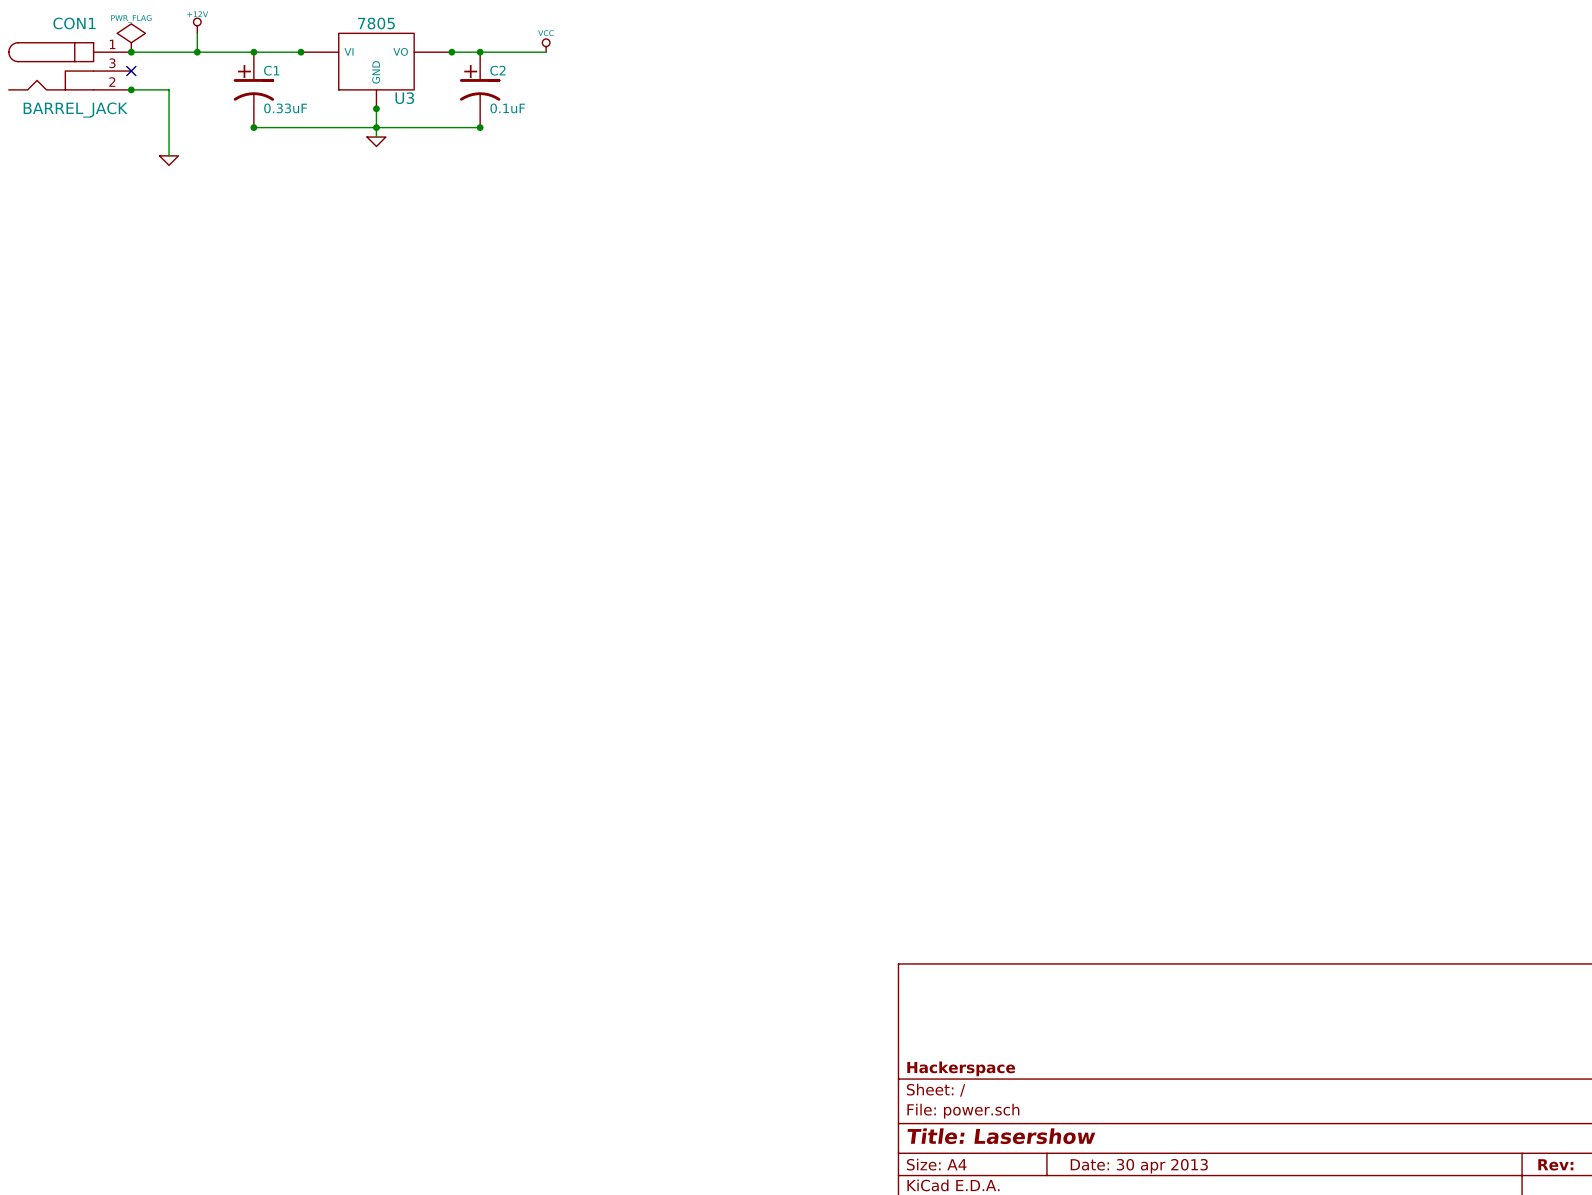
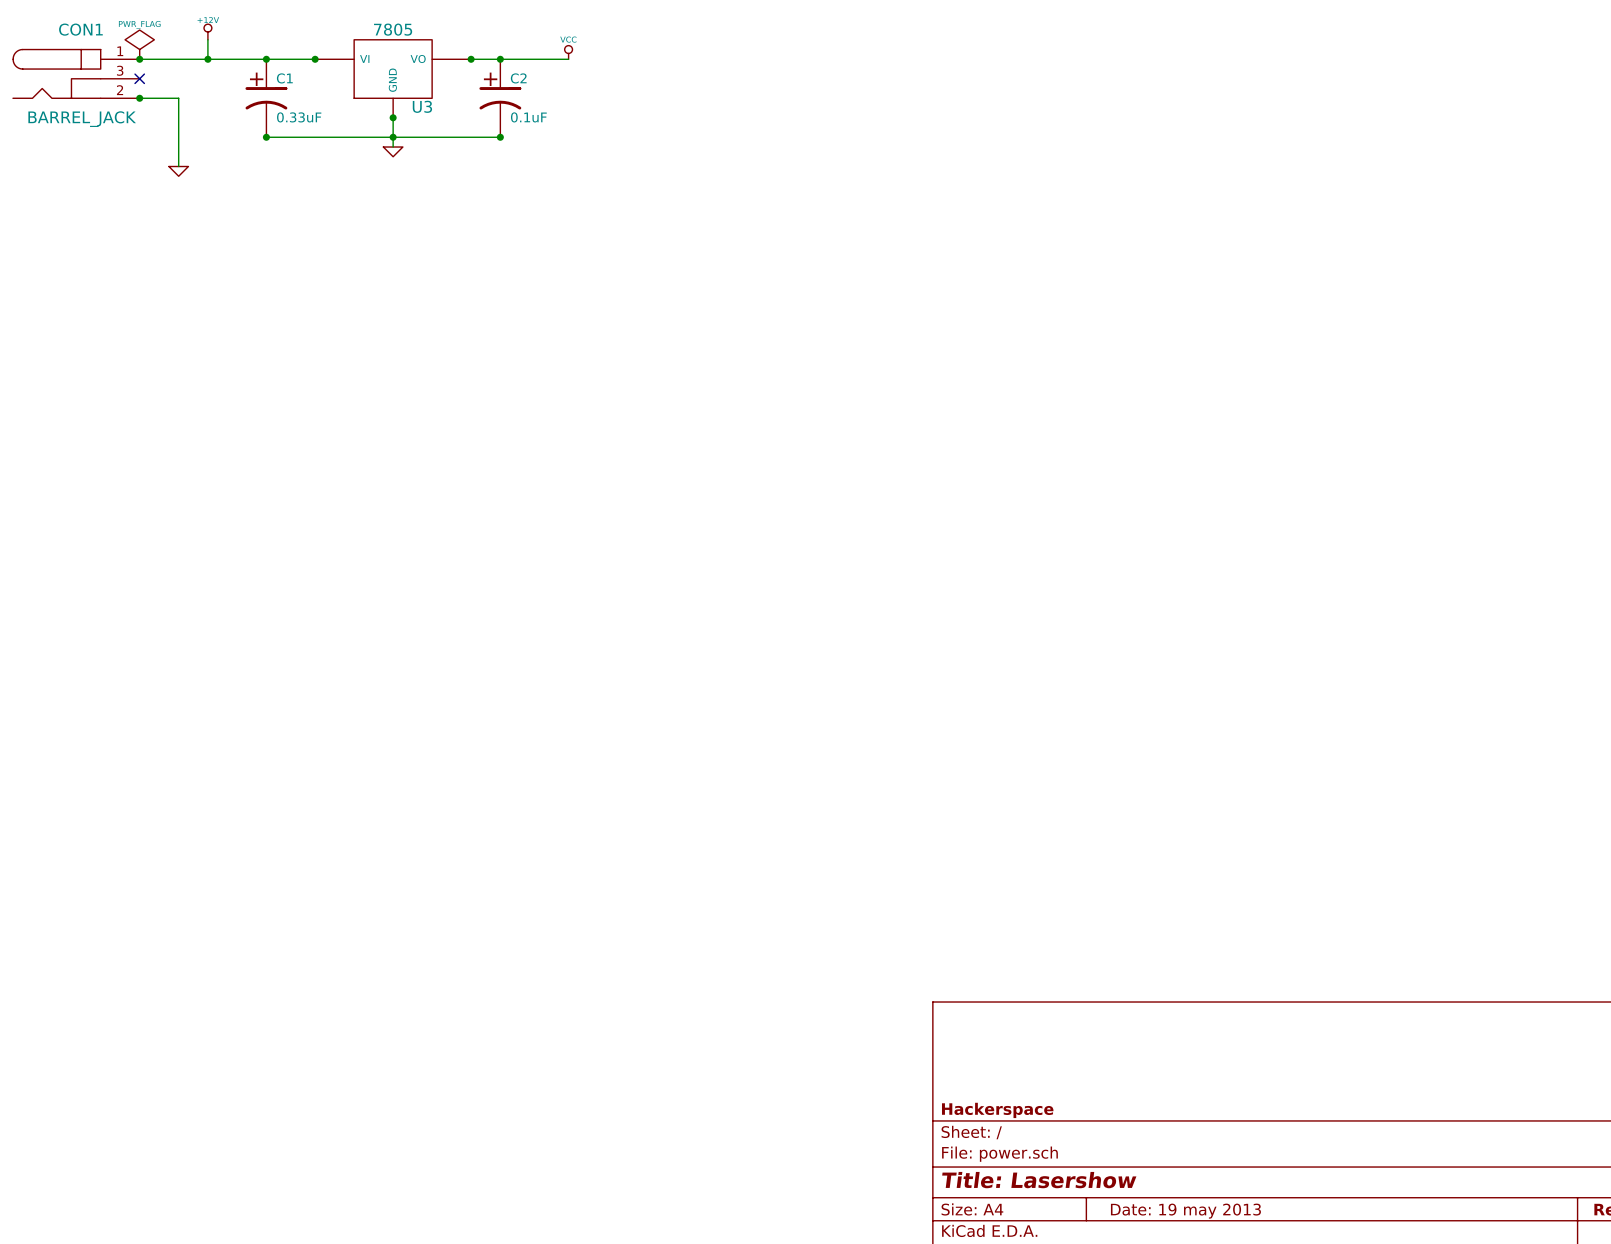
title block: Date: 30 apr 2013 (1139, 1166) -> Date: 19 may 2013 (1185, 1211)

